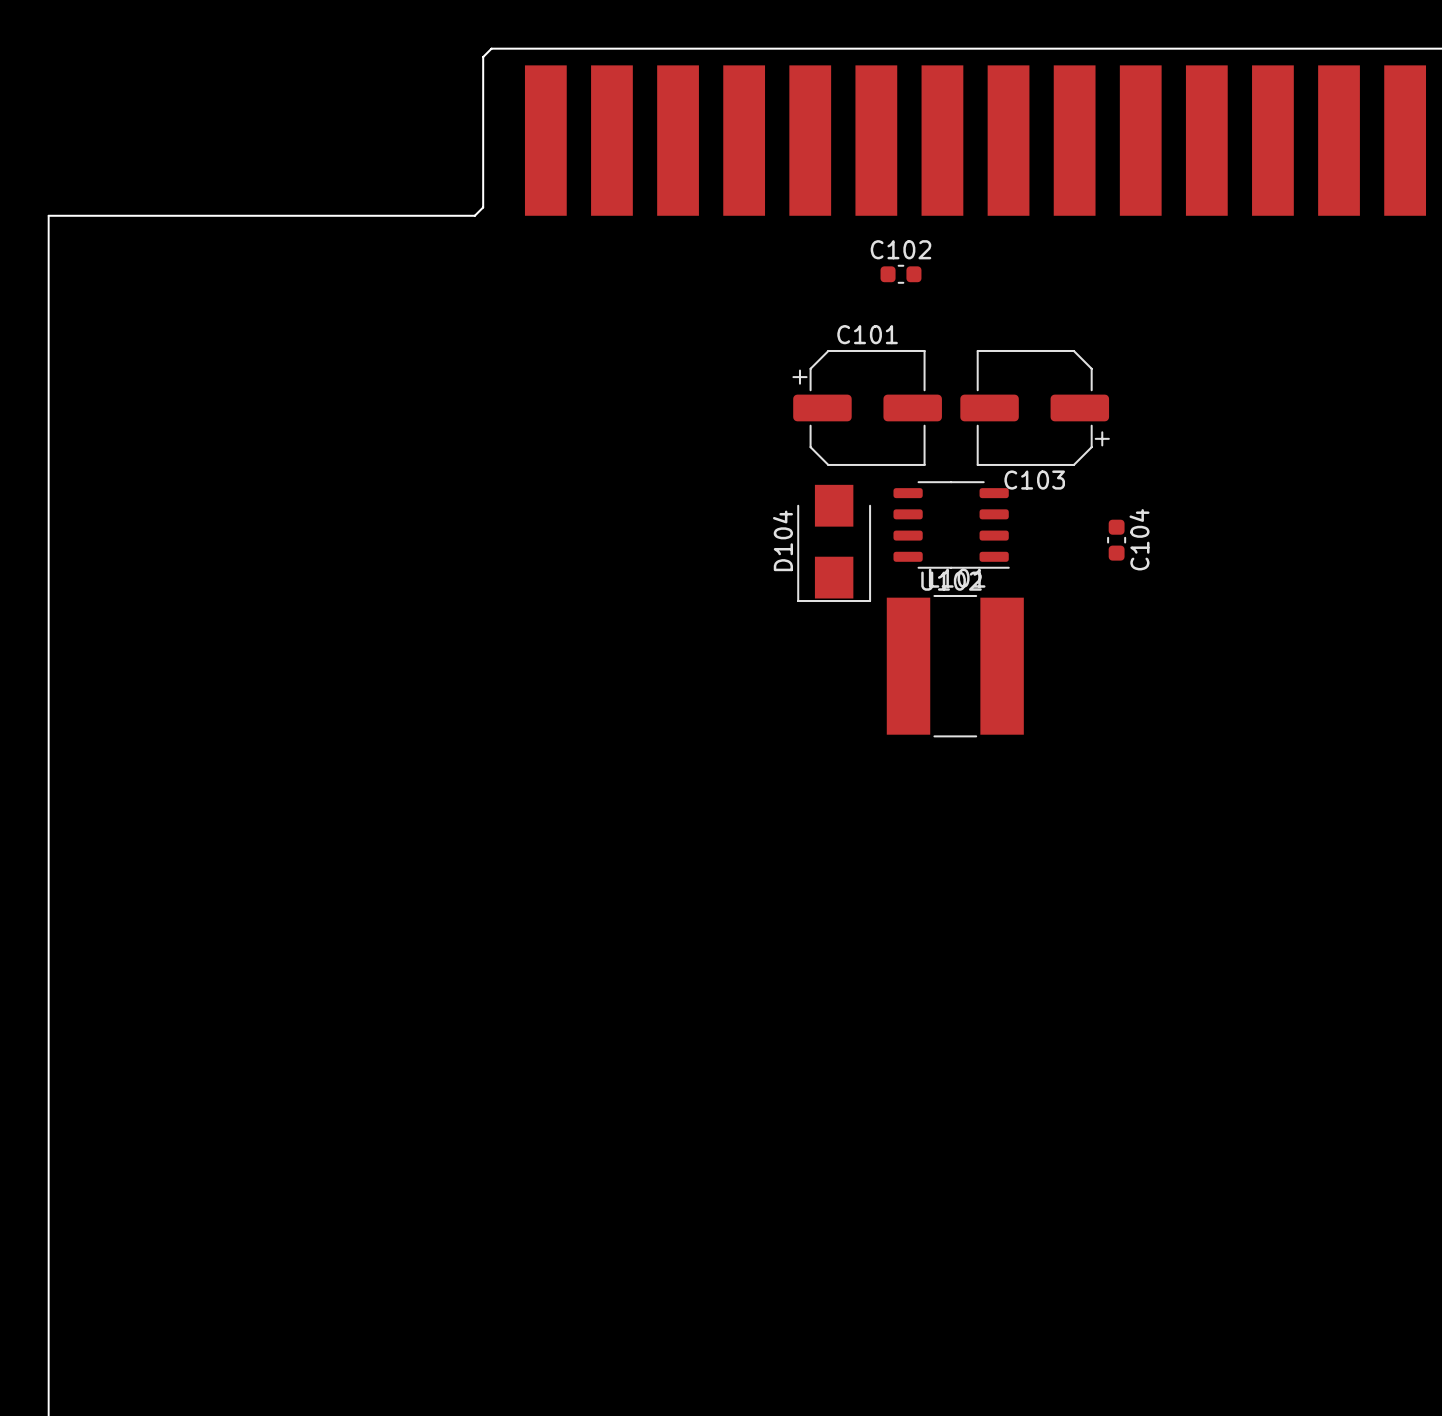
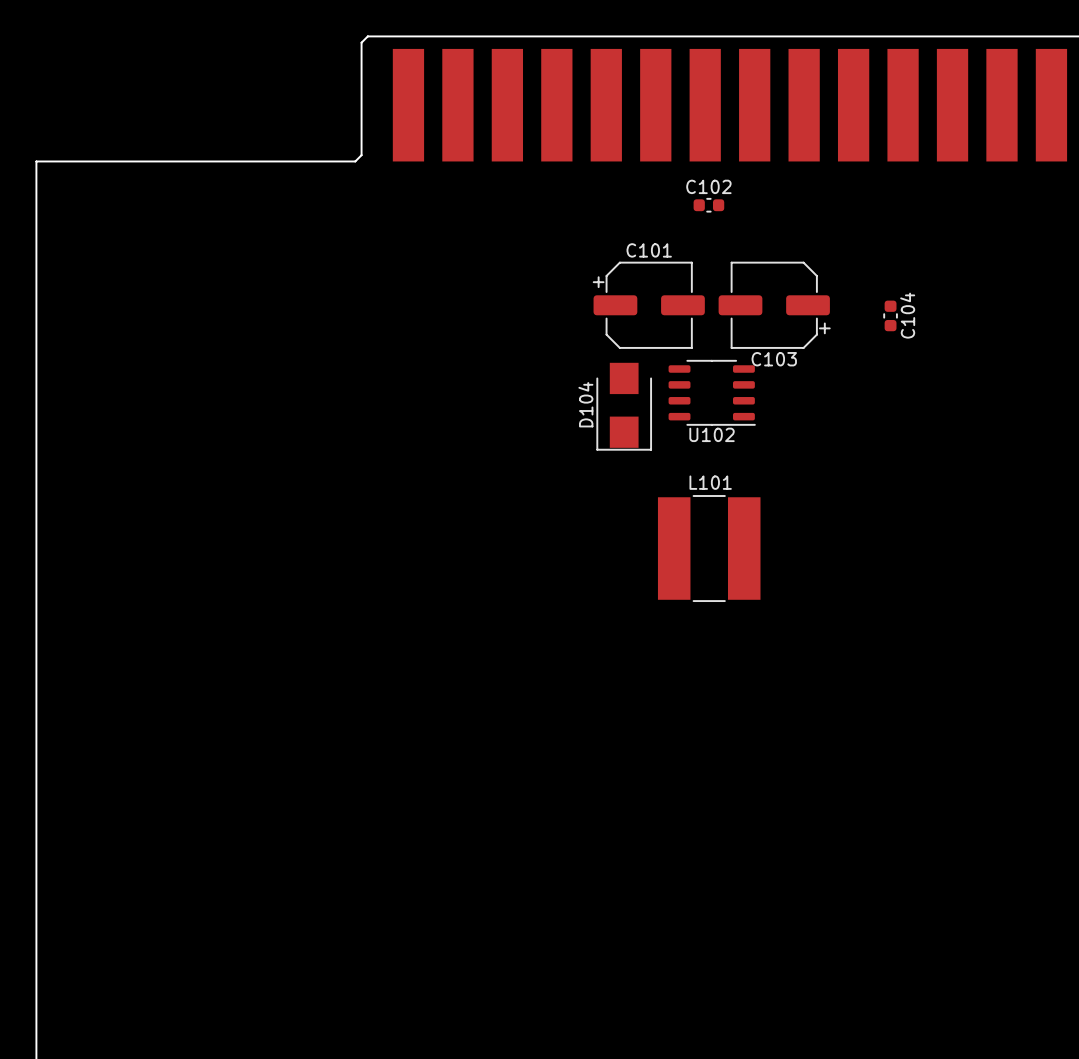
C102 position: (900, 274) -> (708, 205)
C104 position: (1116, 540) -> (890, 315)
L101 position: (955, 666) -> (709, 548)

